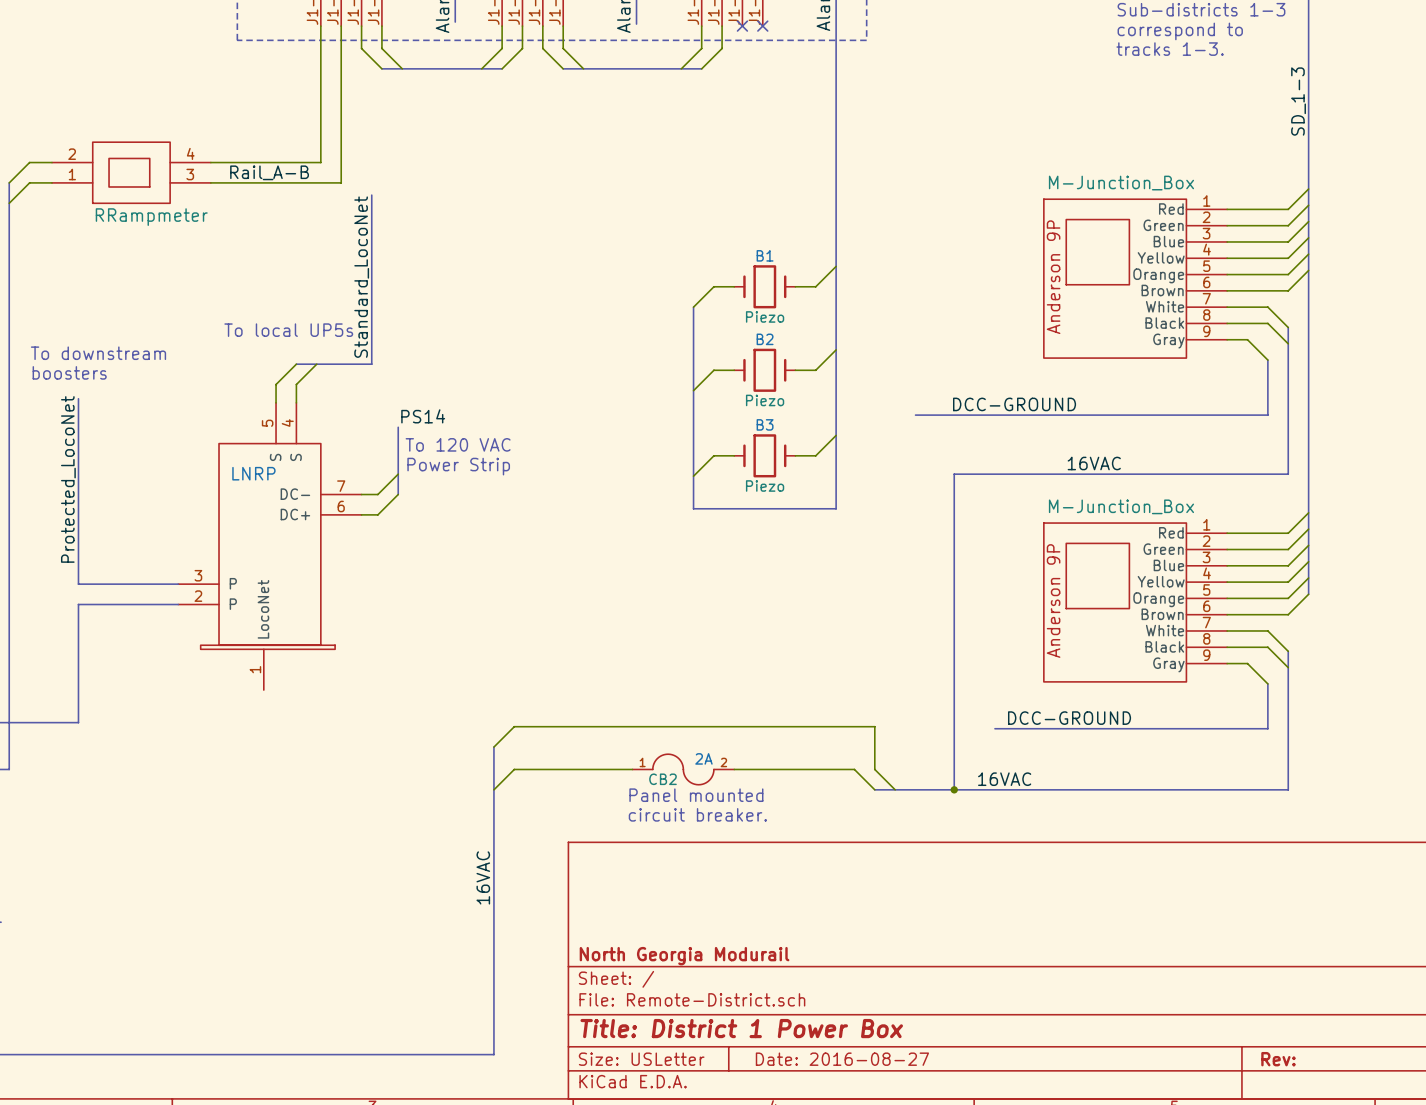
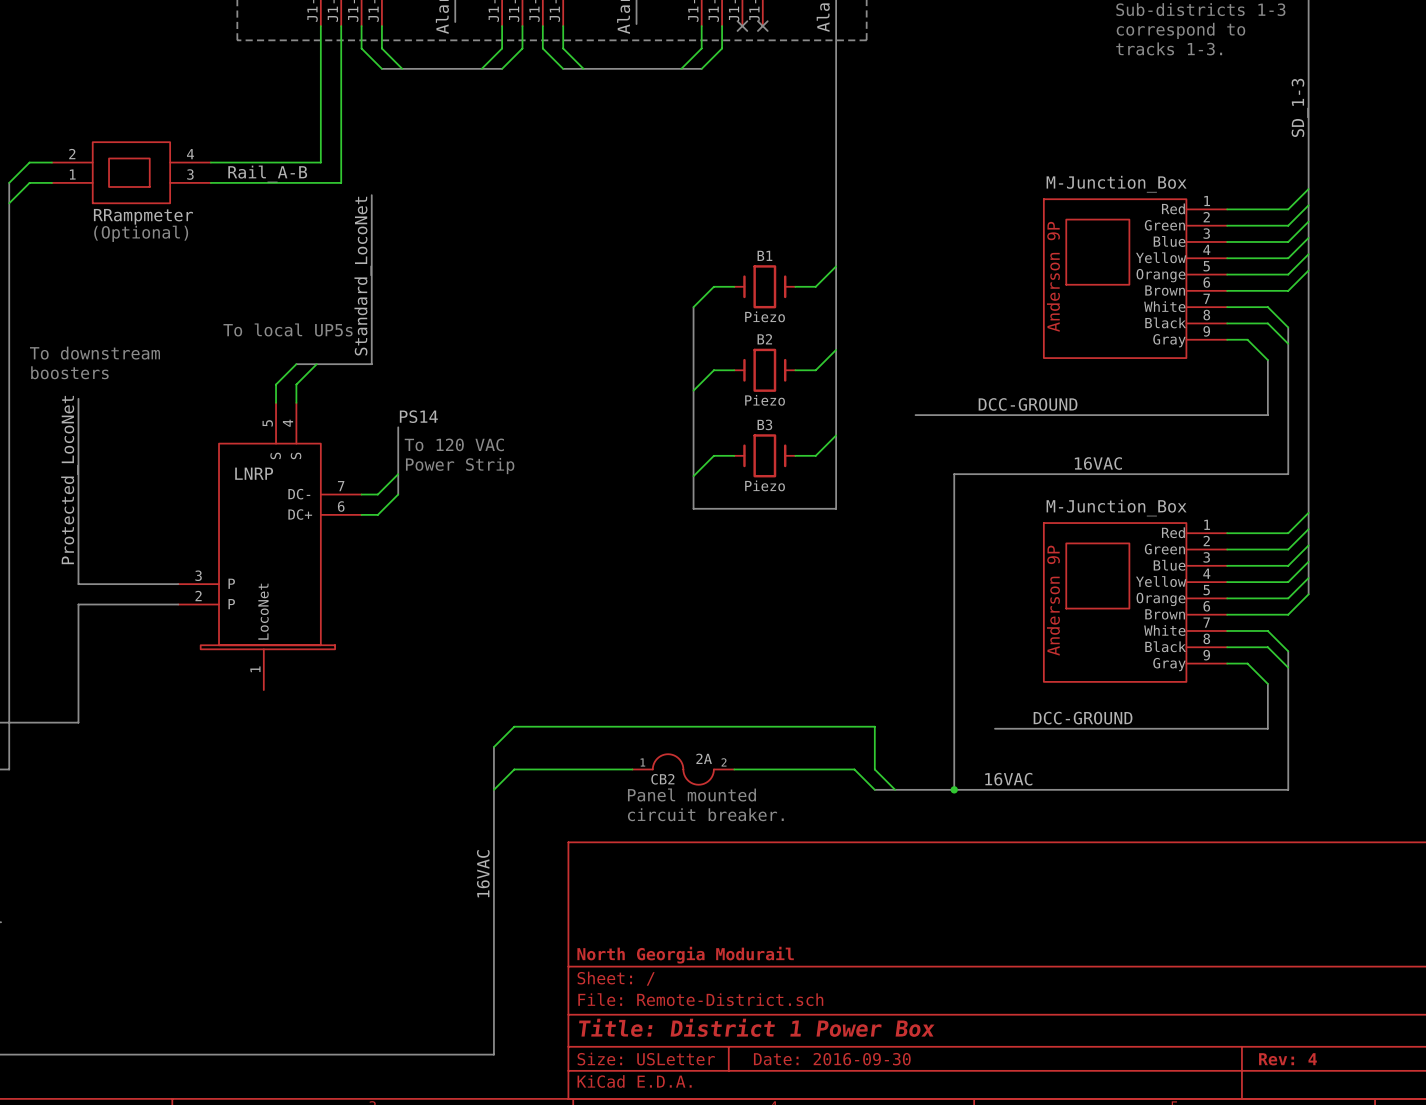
text: none -> (Optional) (141, 233)
title block: Date: 2016-08-27 (842, 1059) -> Date: 2016-09-30 (832, 1059)
title block: Rev: (1278, 1059) -> Rev: 4 (1287, 1059)

